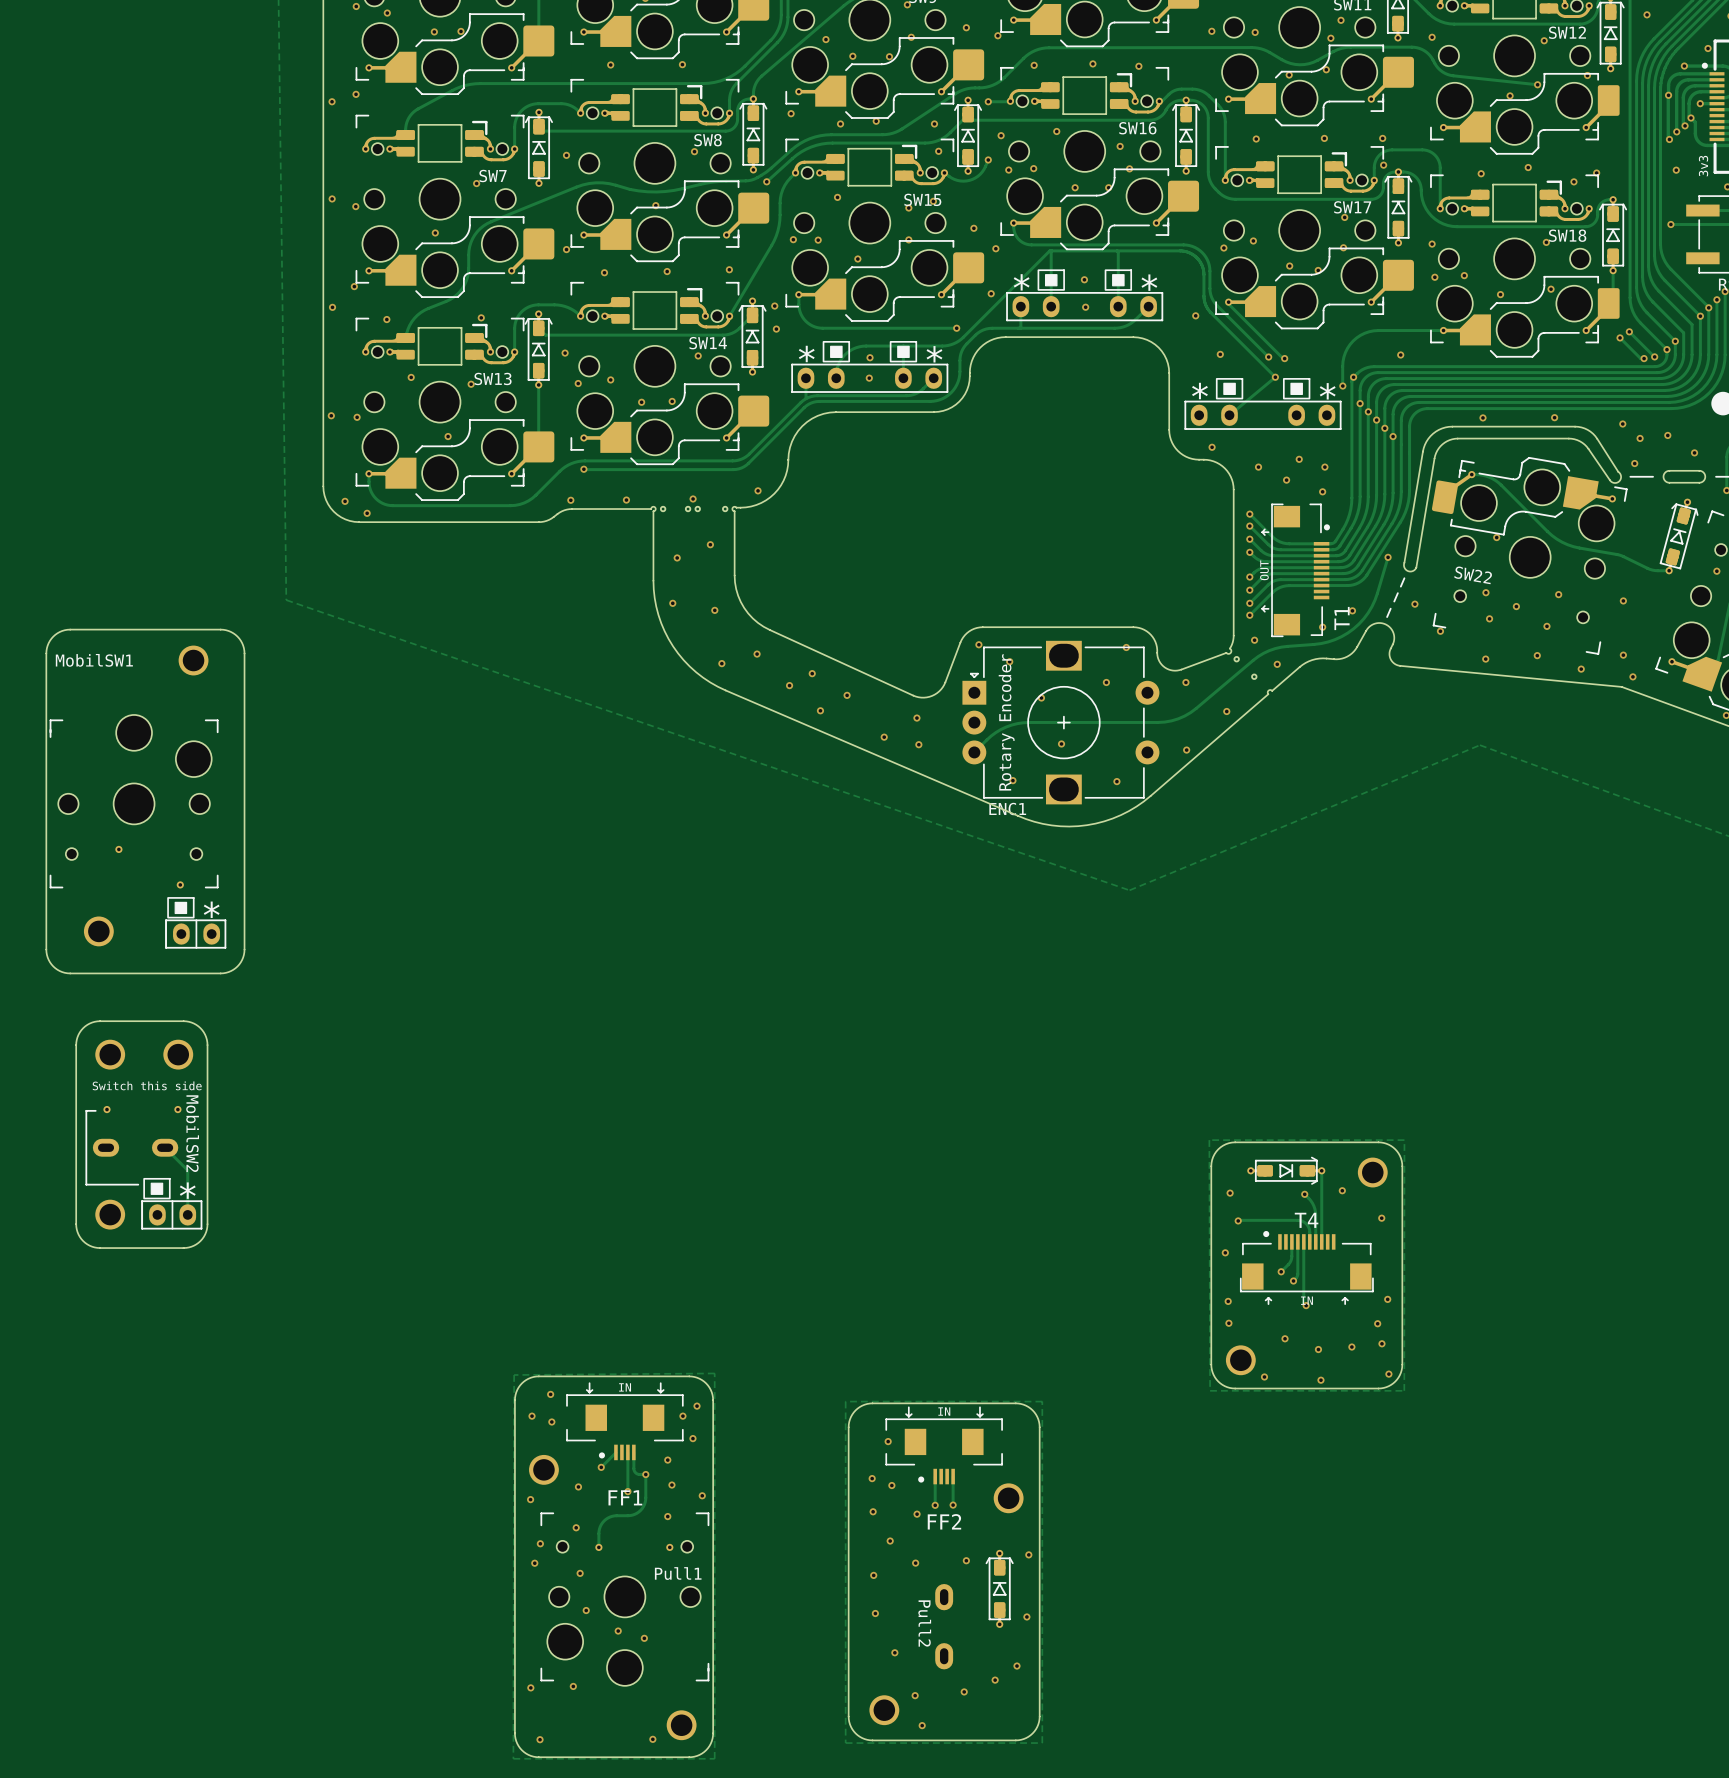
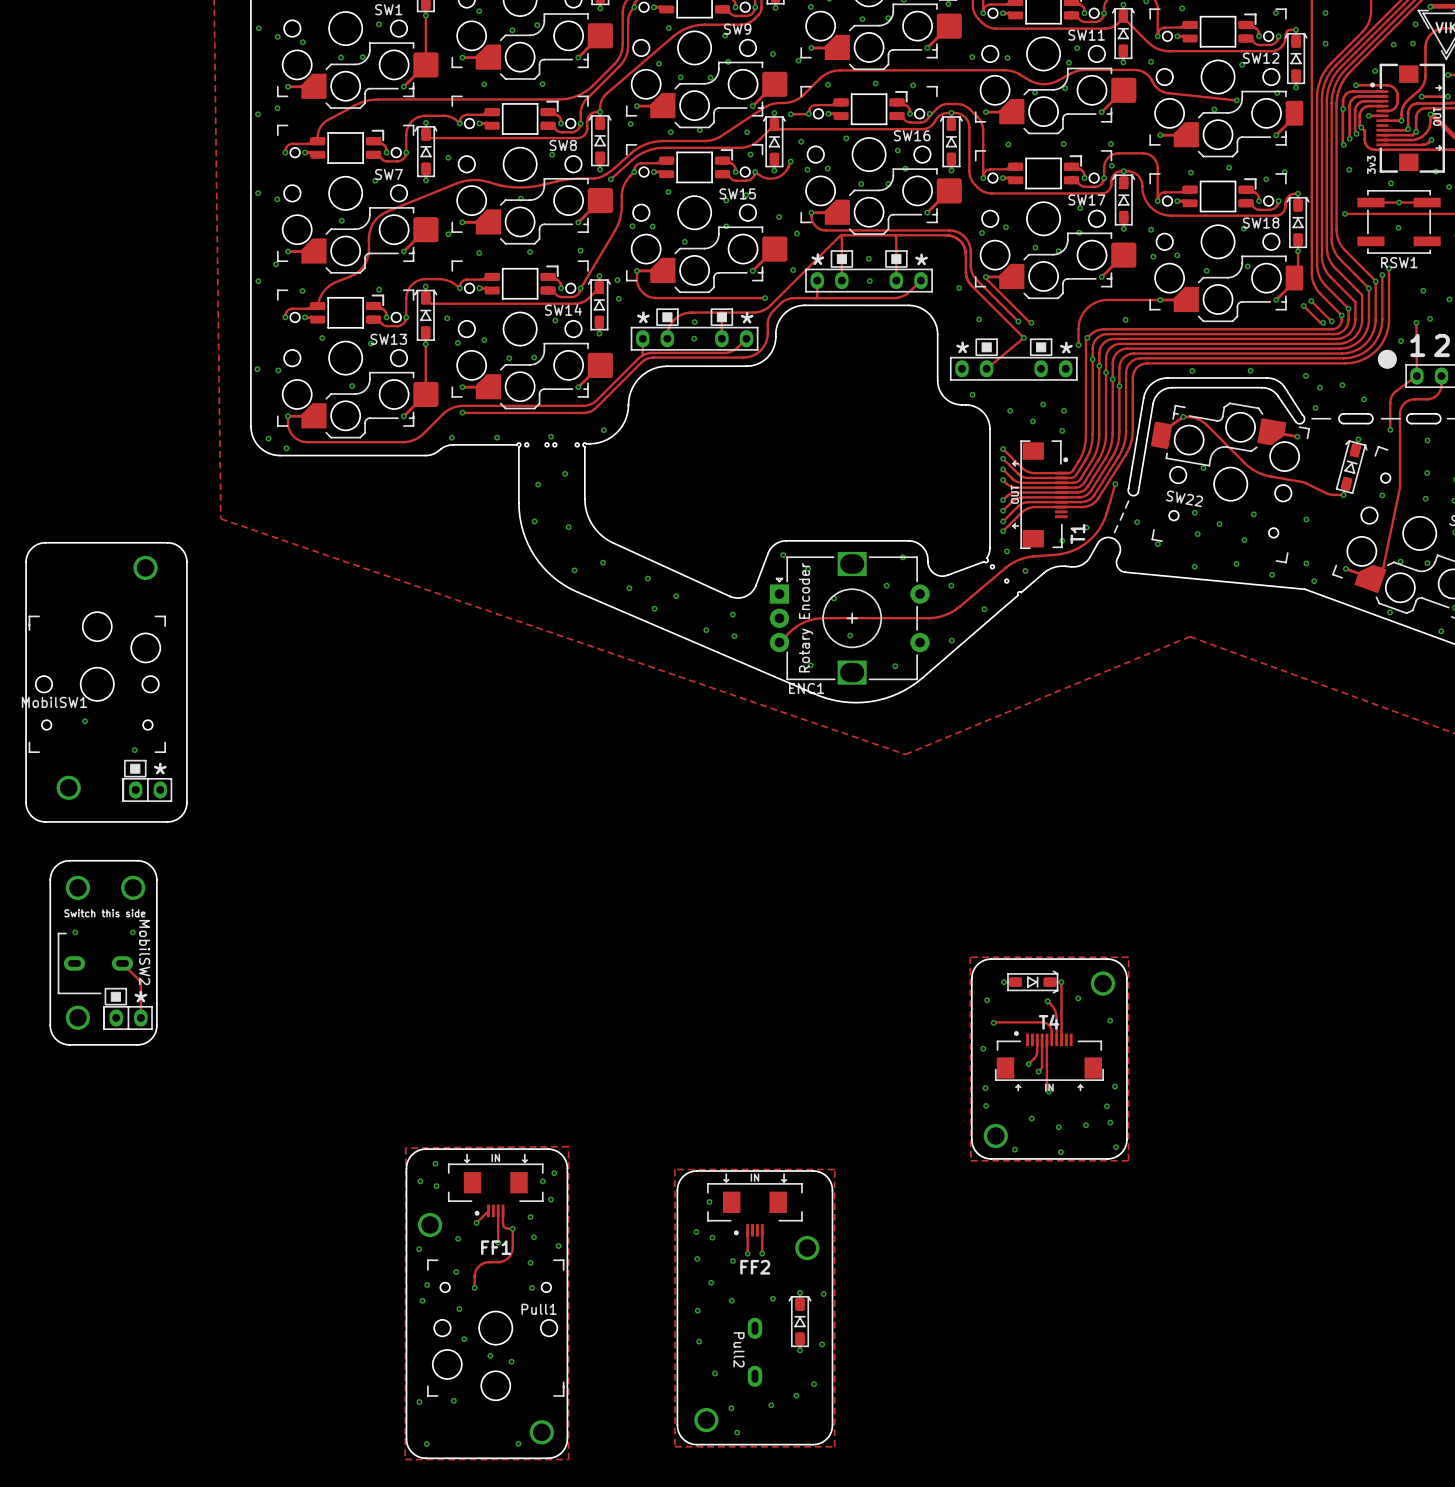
MobilSW1 name position: MobilSW1 (94, 660) -> MobilSW1 (54, 702)

